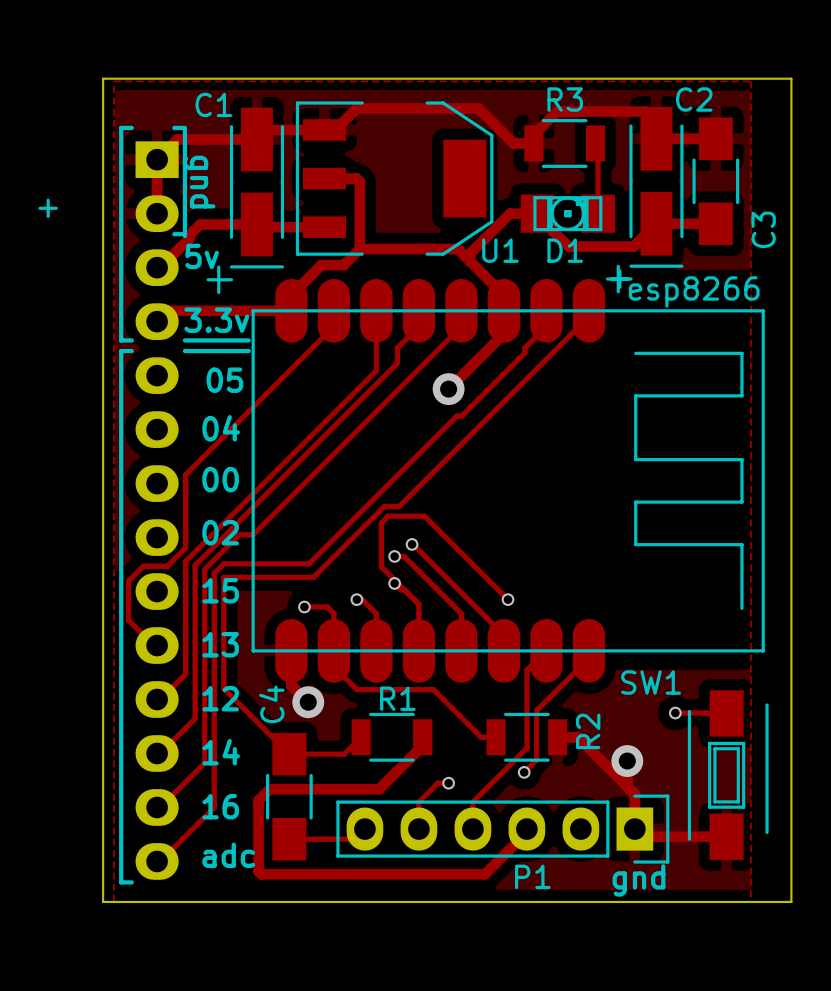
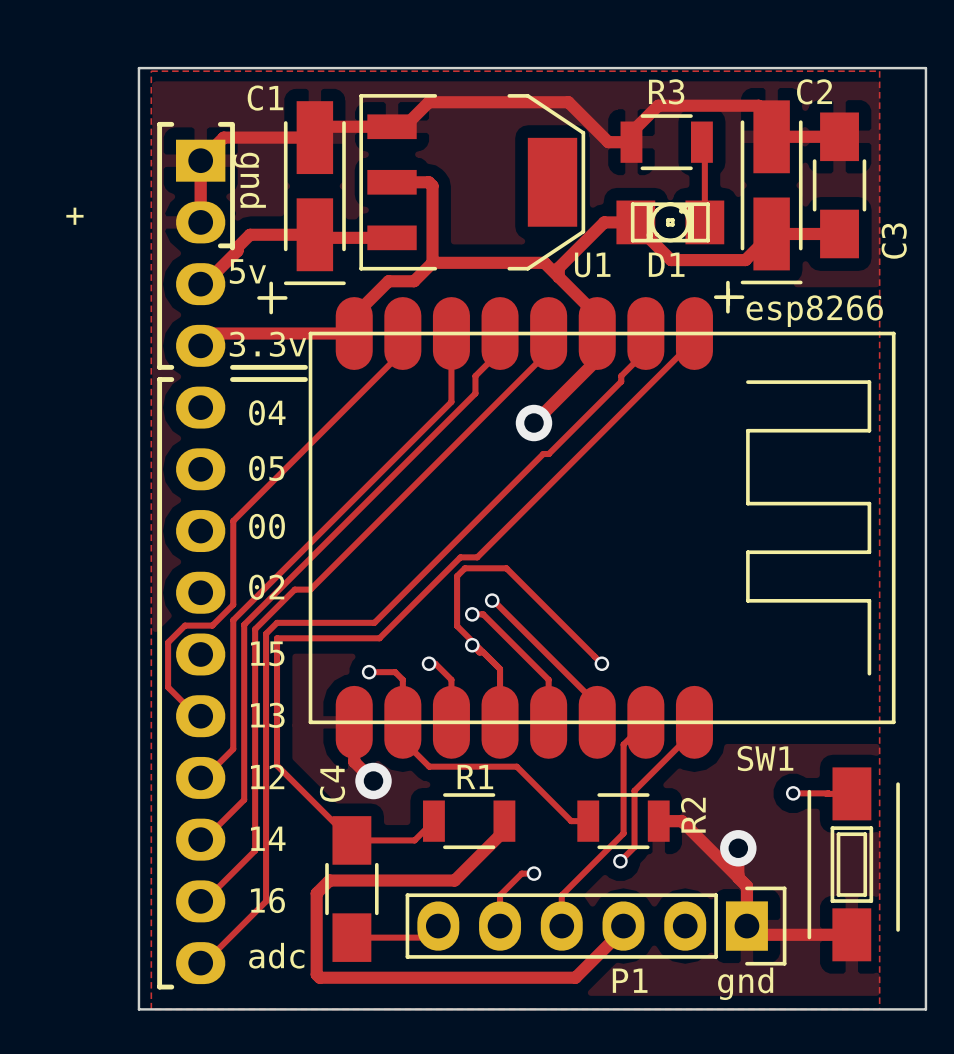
text: 05 (224, 380) -> 04 (267, 412)
text: 04 (221, 428) -> 05 (266, 468)

